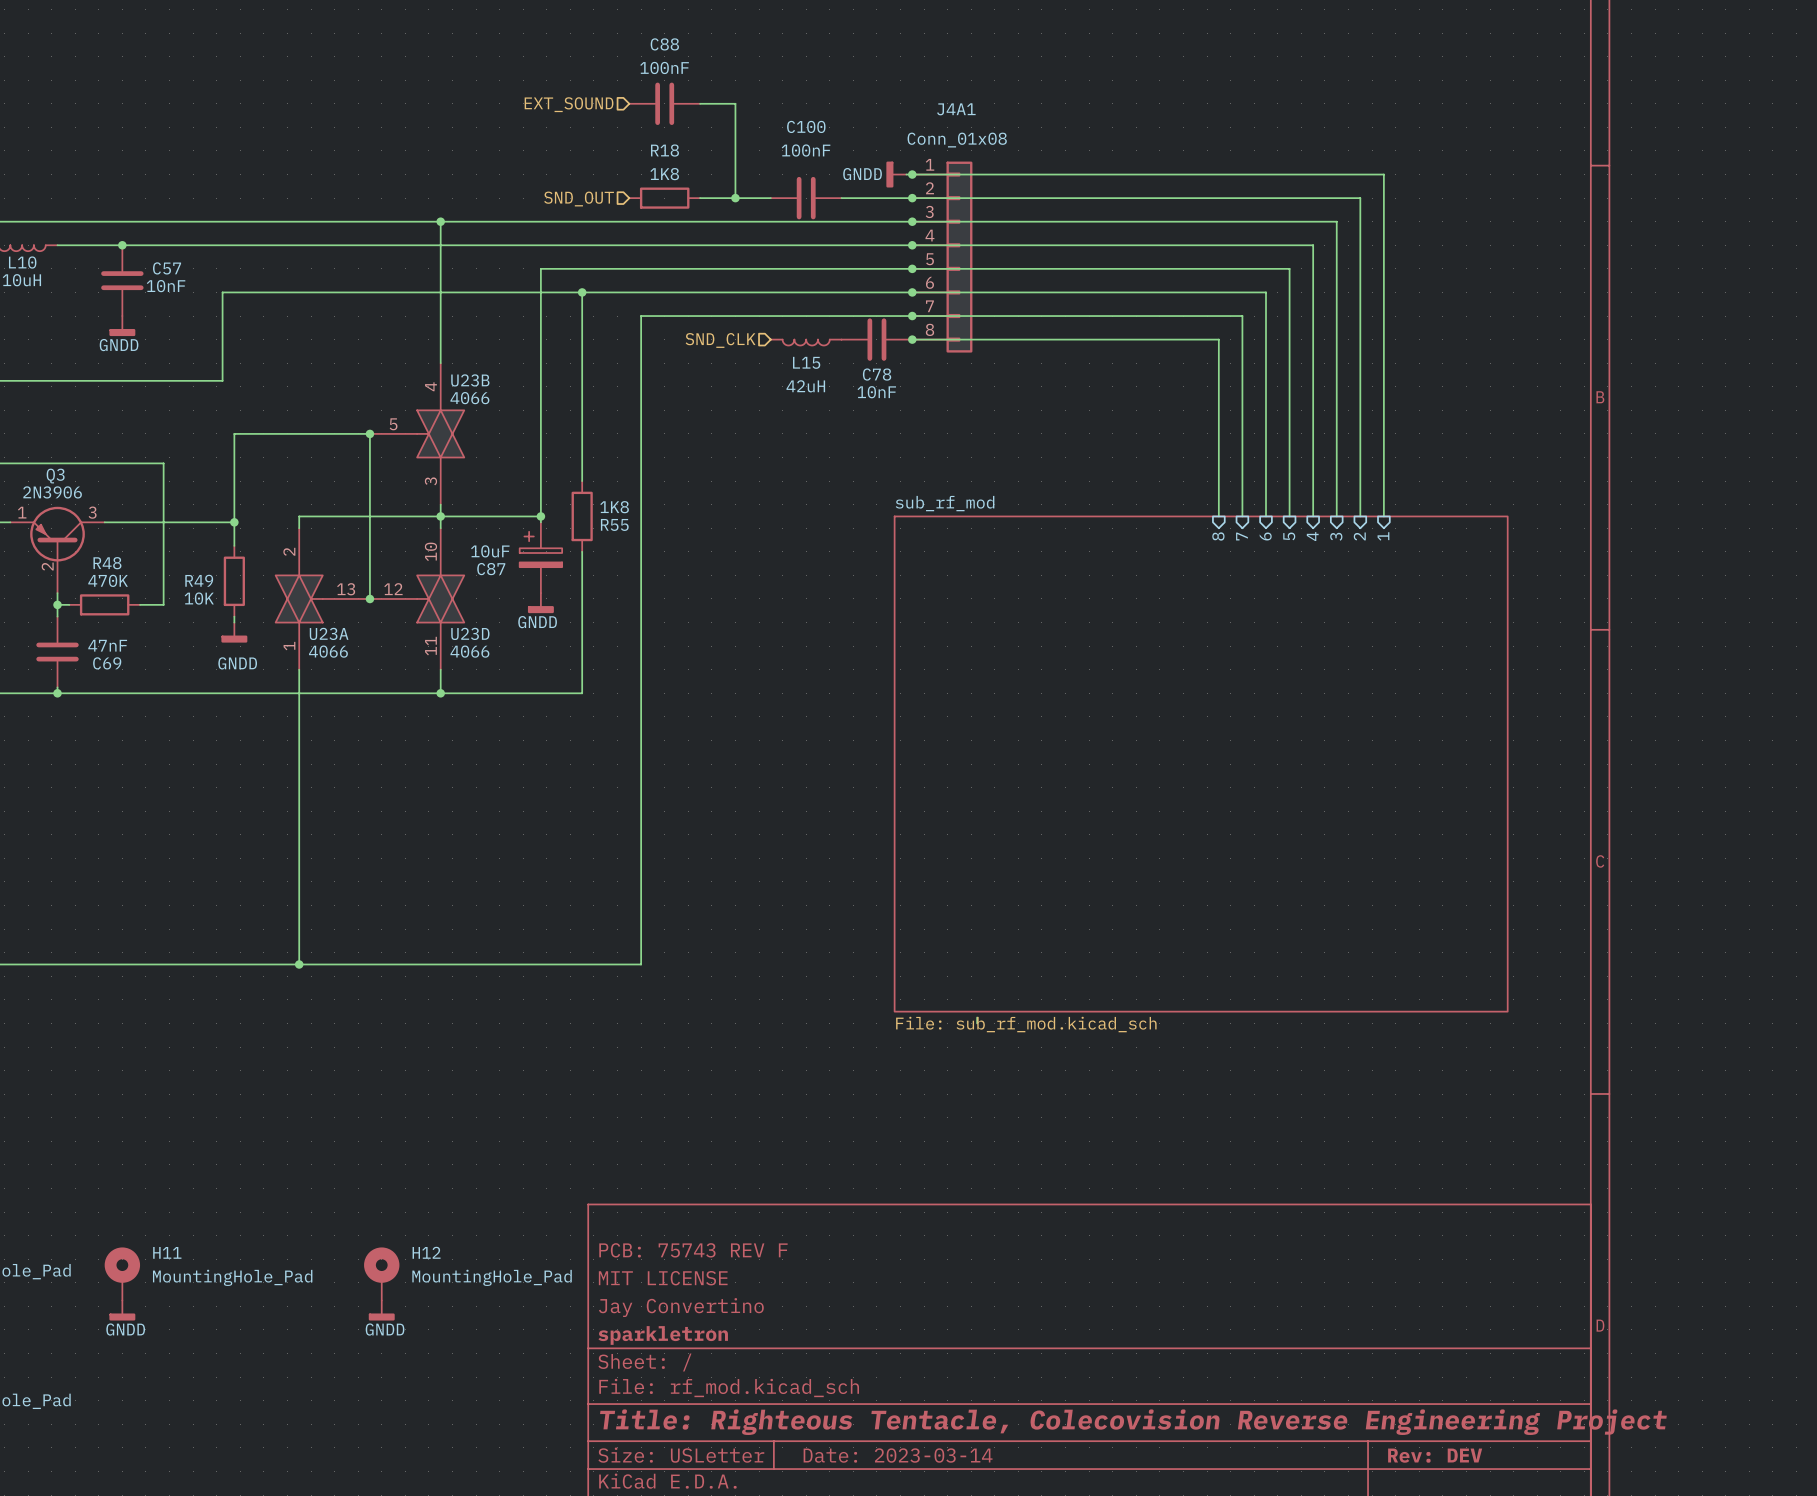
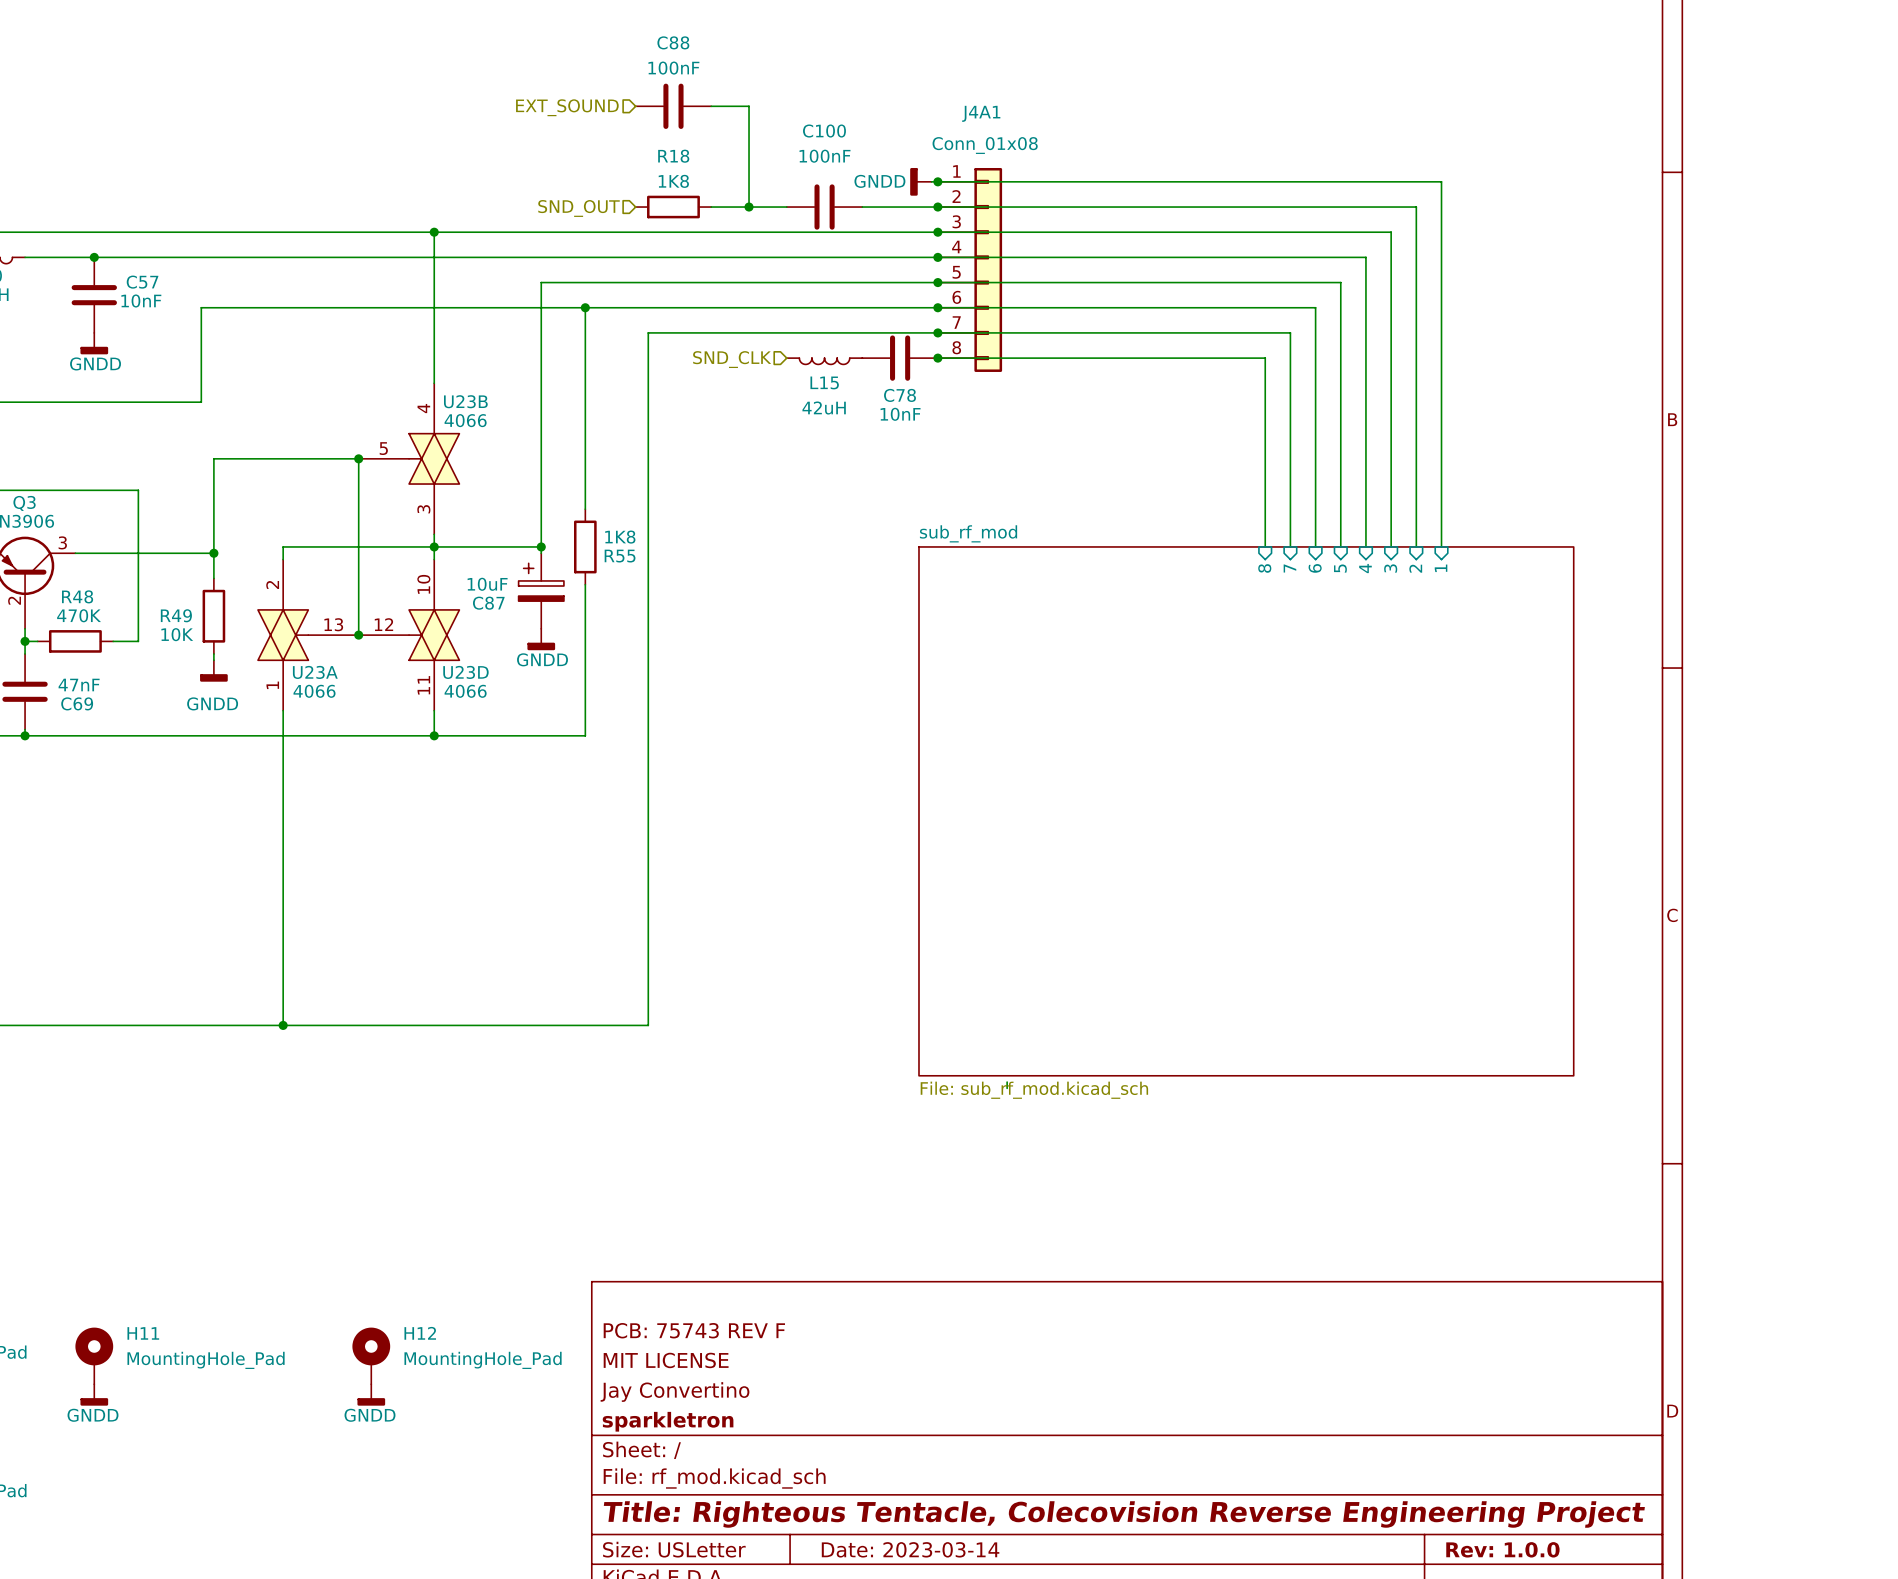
title block: Rev: DEV (1435, 1455) -> Rev: 1.0.0 (1502, 1549)

